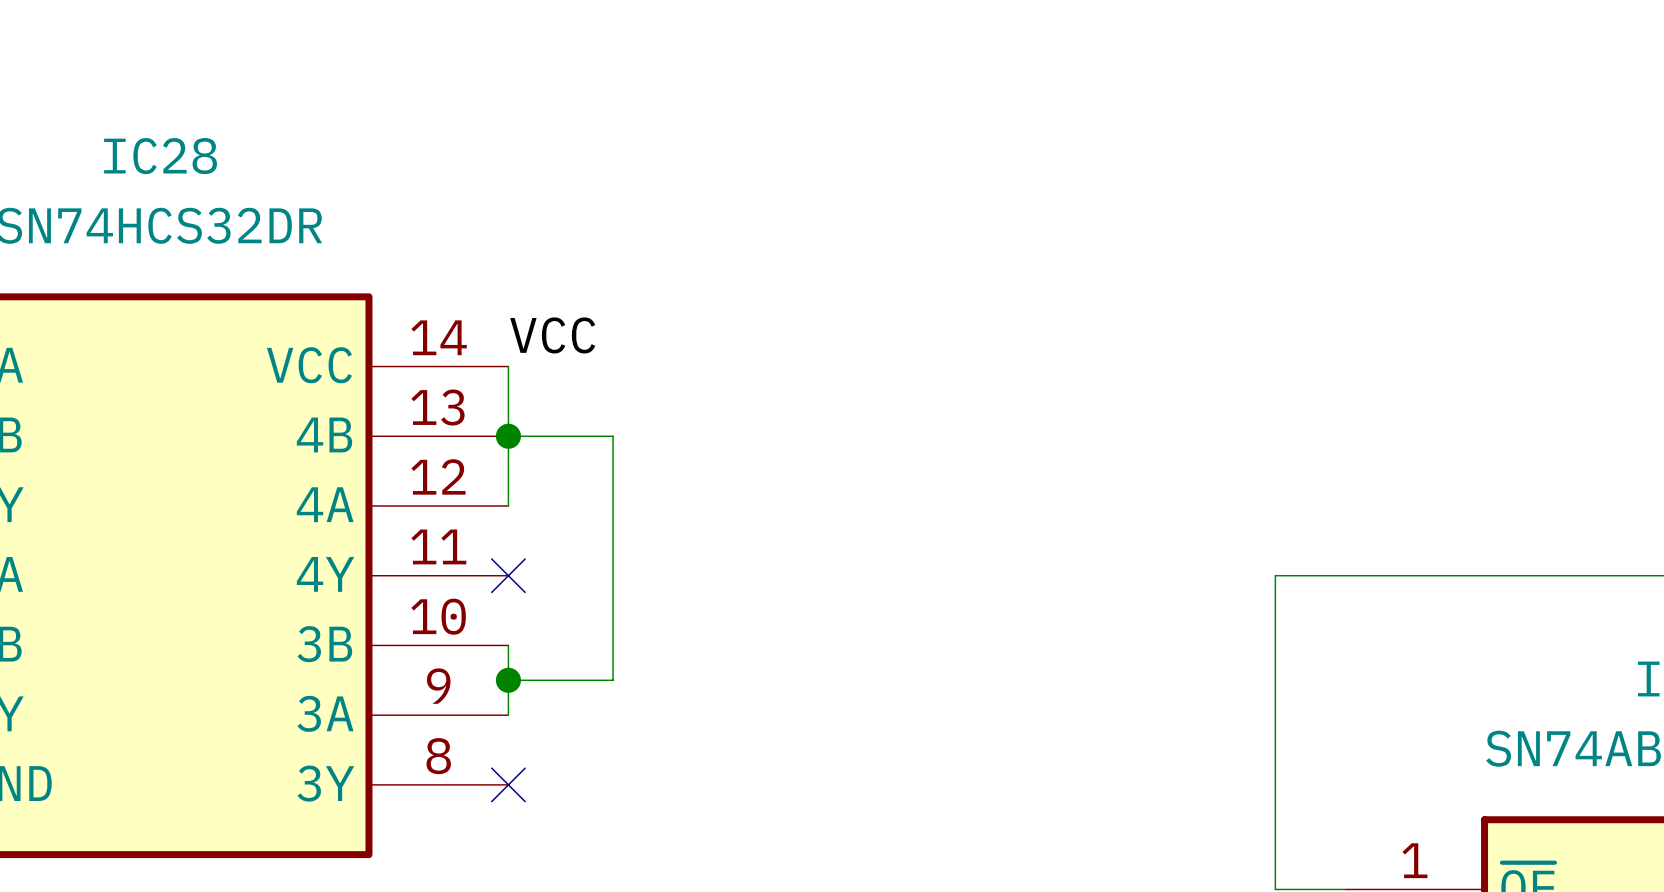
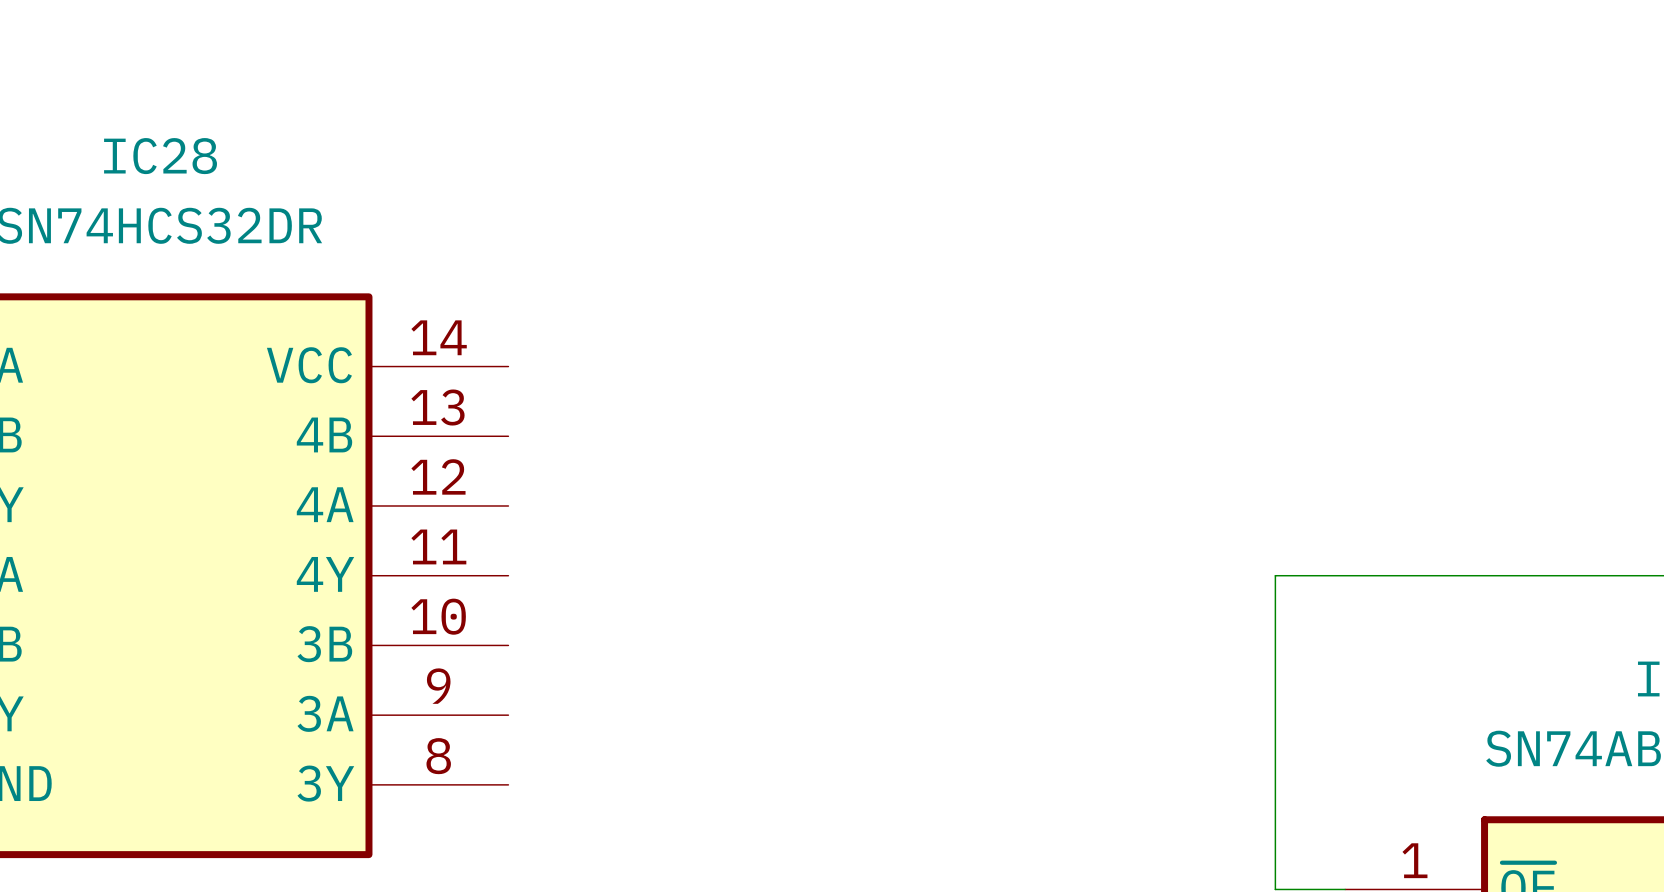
label: VCC (552, 335) -> none
wire: (508, 366) (508, 505) -> none
wire: (508, 436) (613, 436) (613, 680) (508, 680) -> none
junction: (508, 436) -> none
no-connect mark: (508, 575) -> none
wire: (508, 645) (508, 715) -> none
junction: (508, 680) -> none
no-connect mark: (508, 784) -> none

